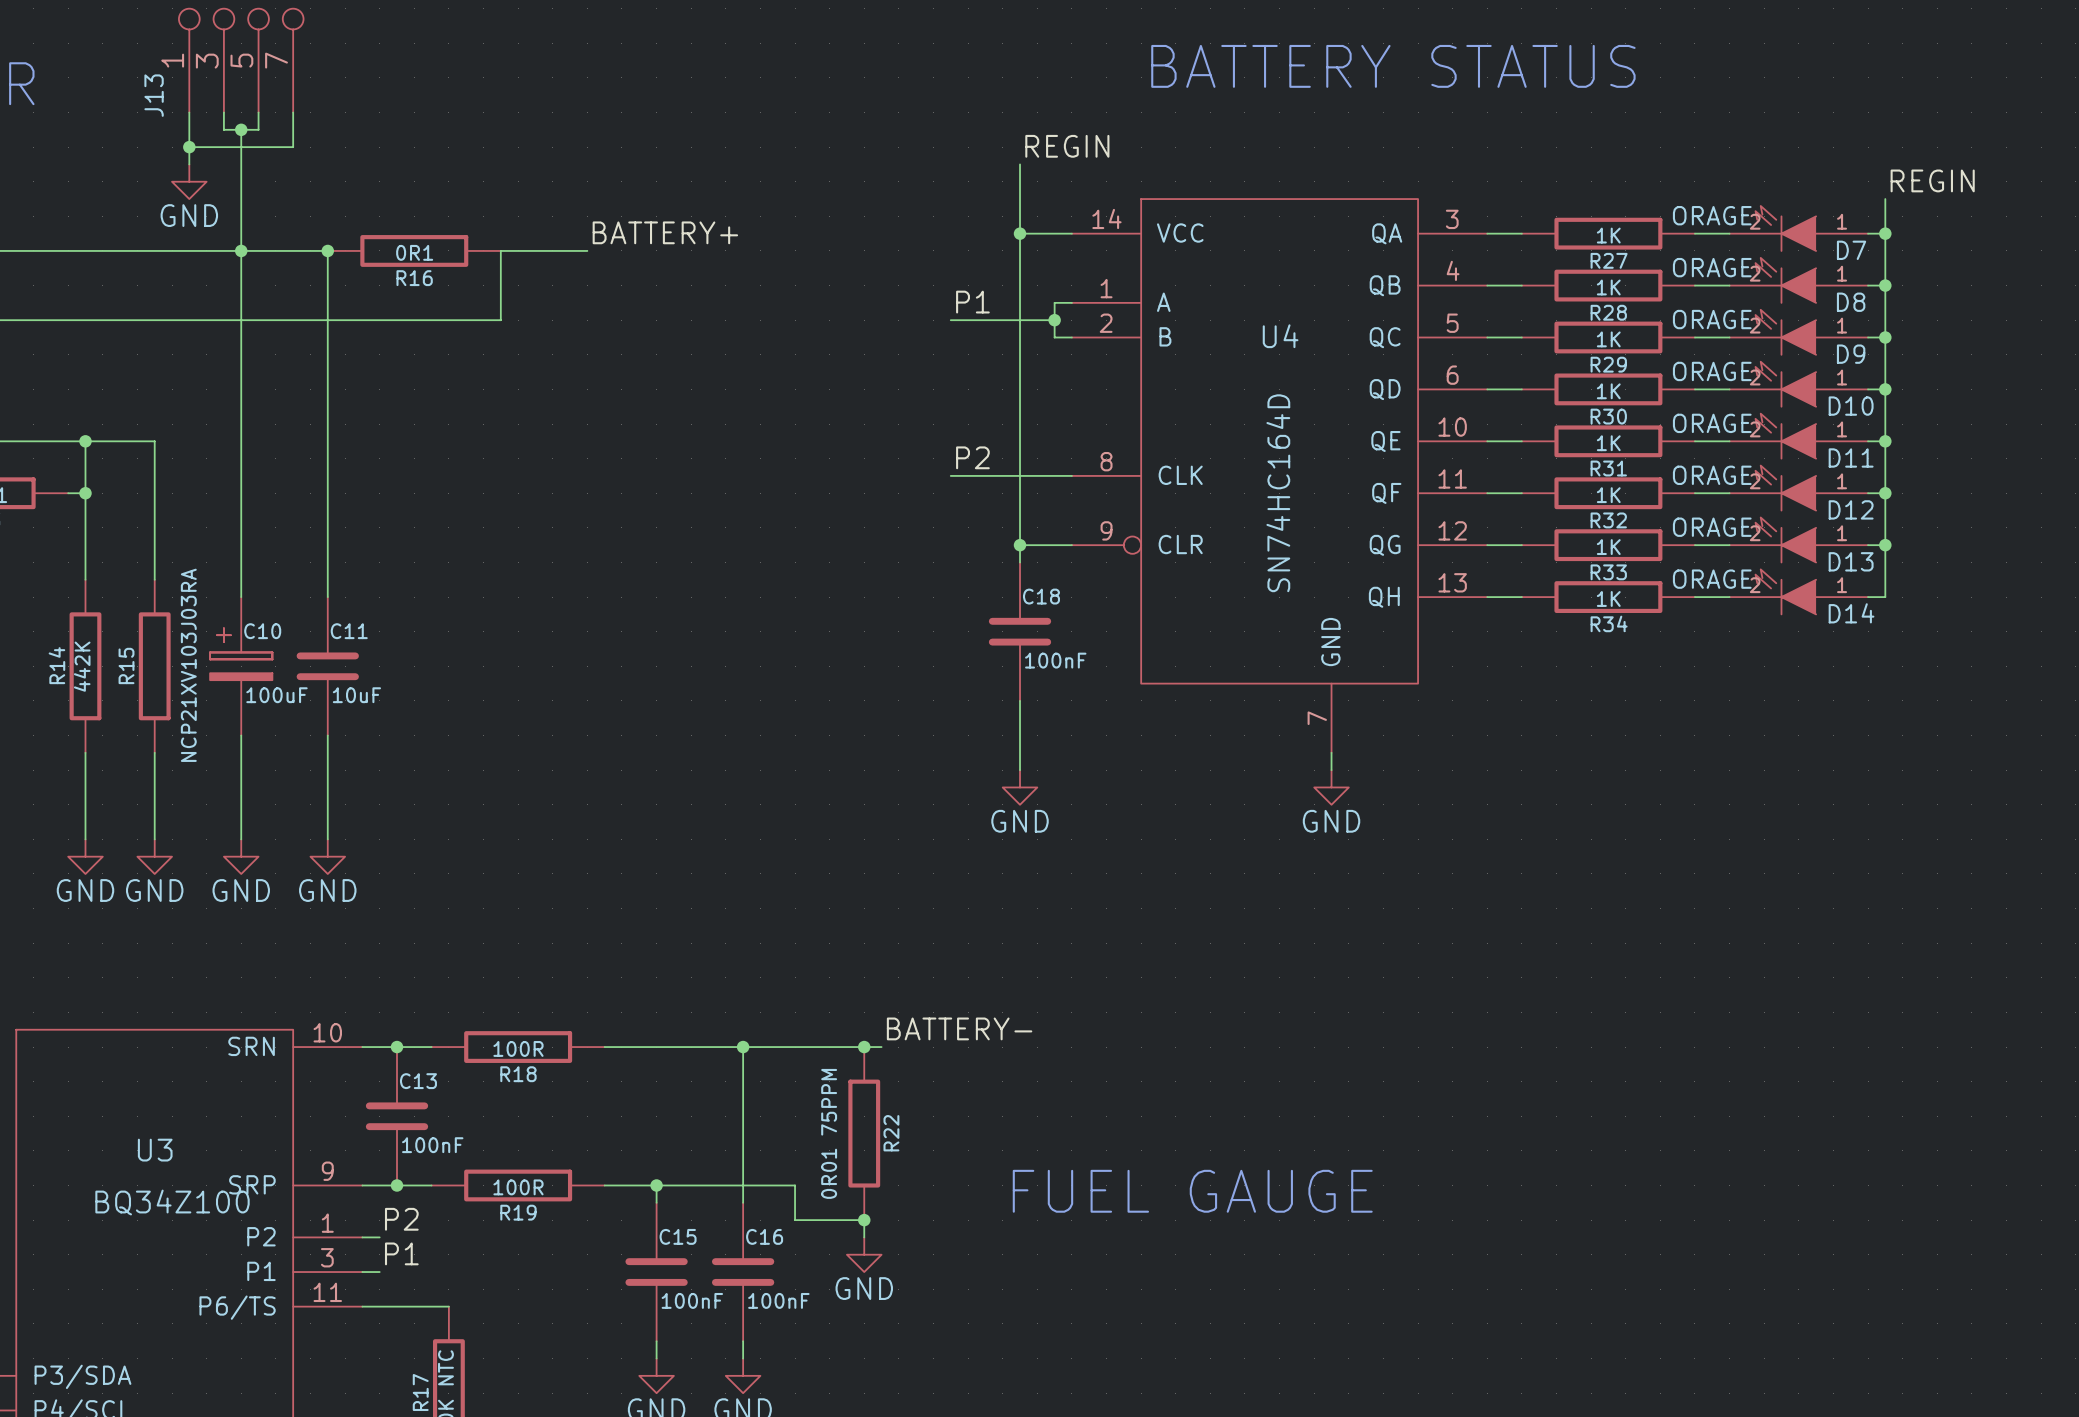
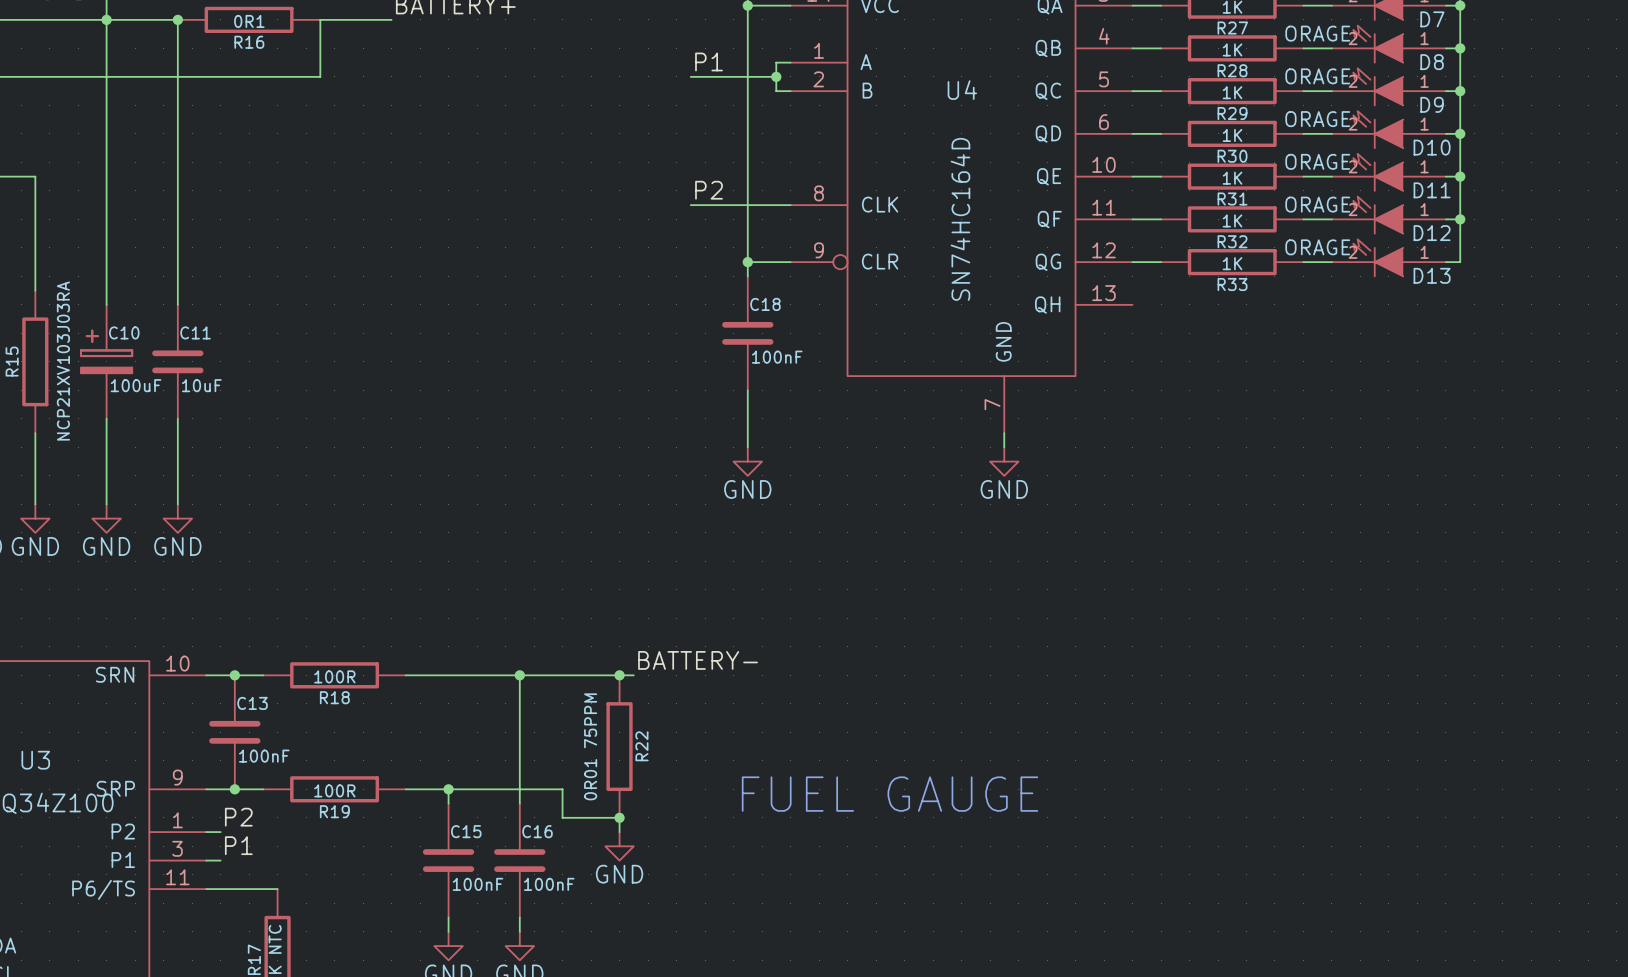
wire: (1885, 545) (1885, 597) (1868, 597) -> none
junction: (1885, 545) -> none
D14: ORAGE (1798, 591) -> none
wire: (1487, 597) (1521, 597) -> none
R34: 1K (1608, 597) -> none
wire: (1694, 597) (1729, 597) -> none

